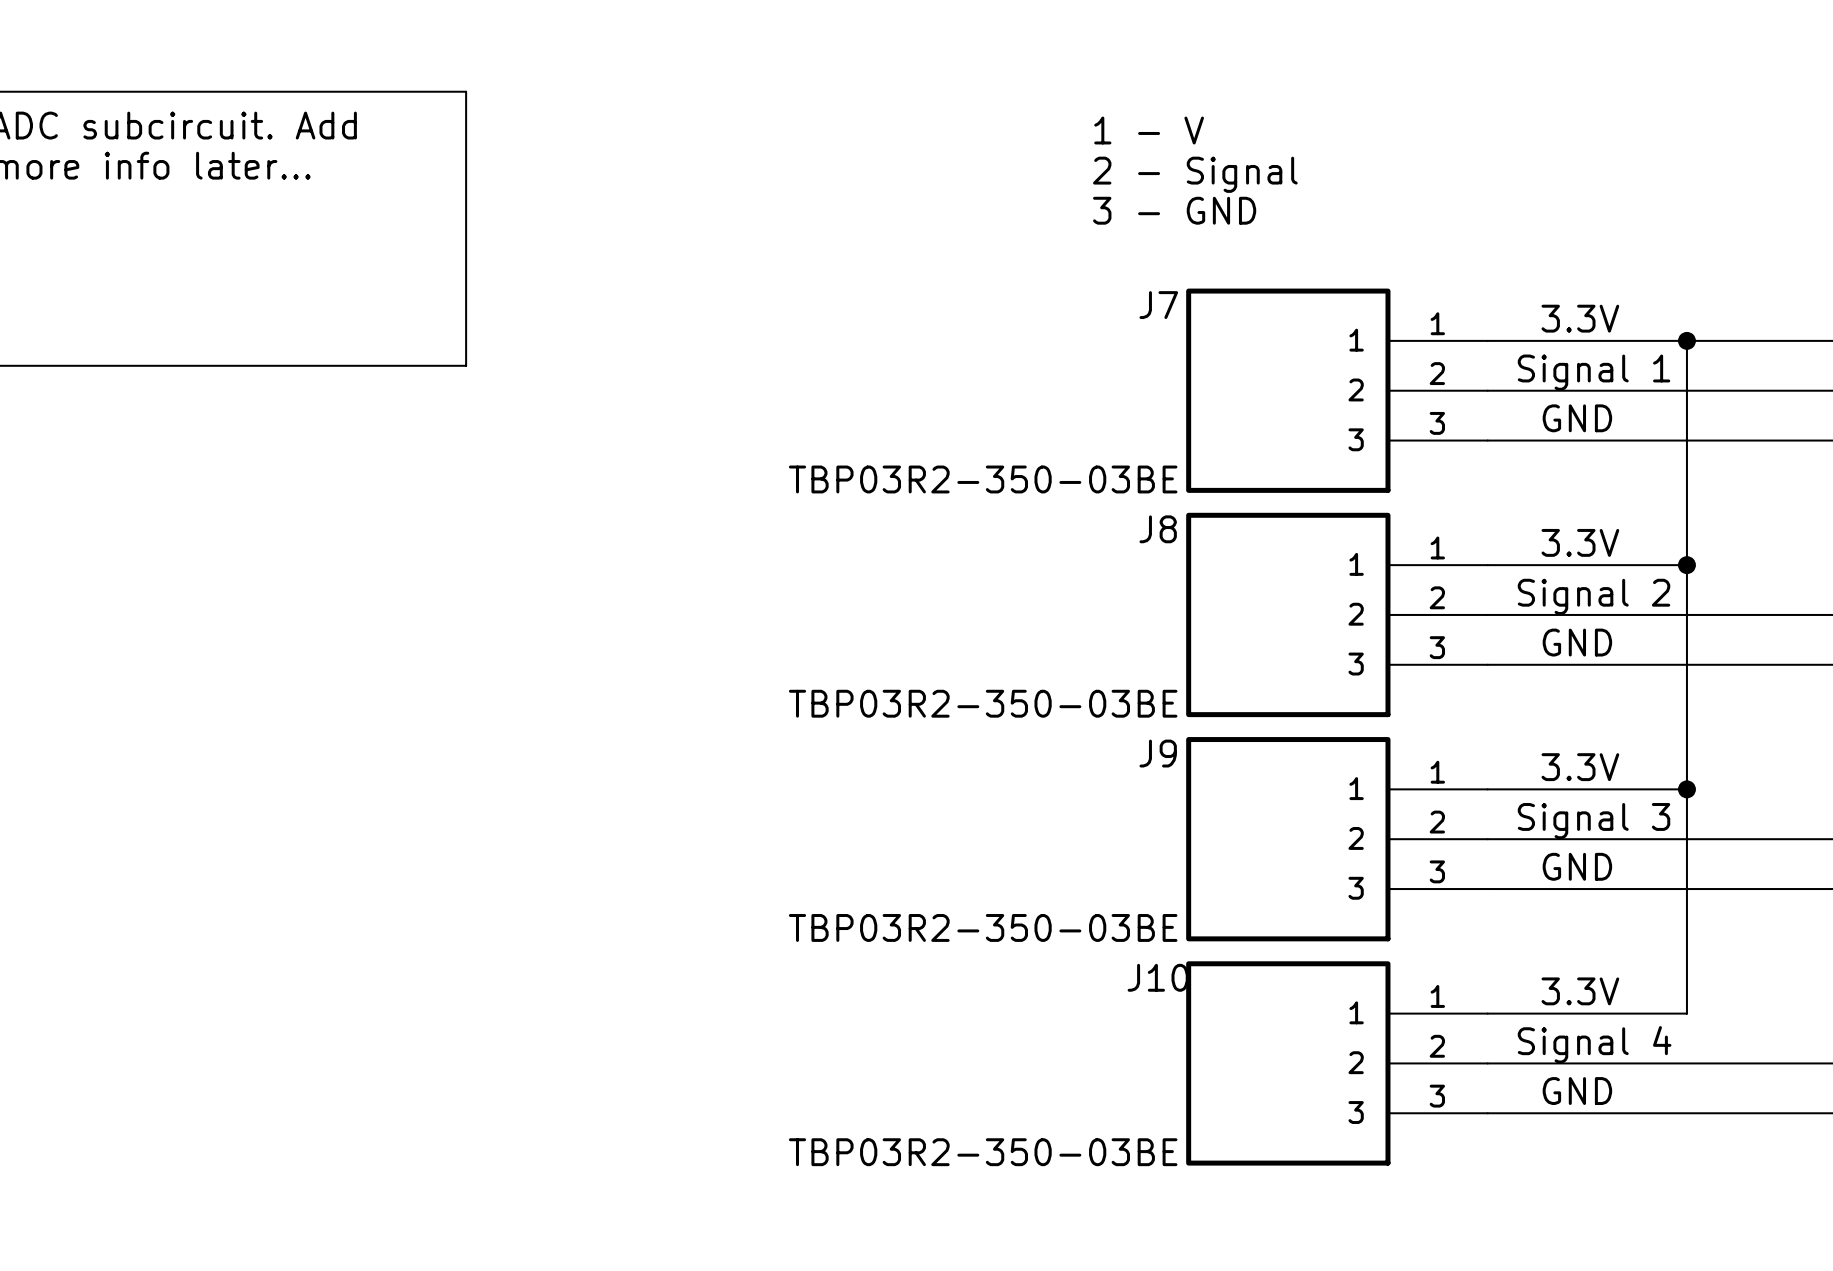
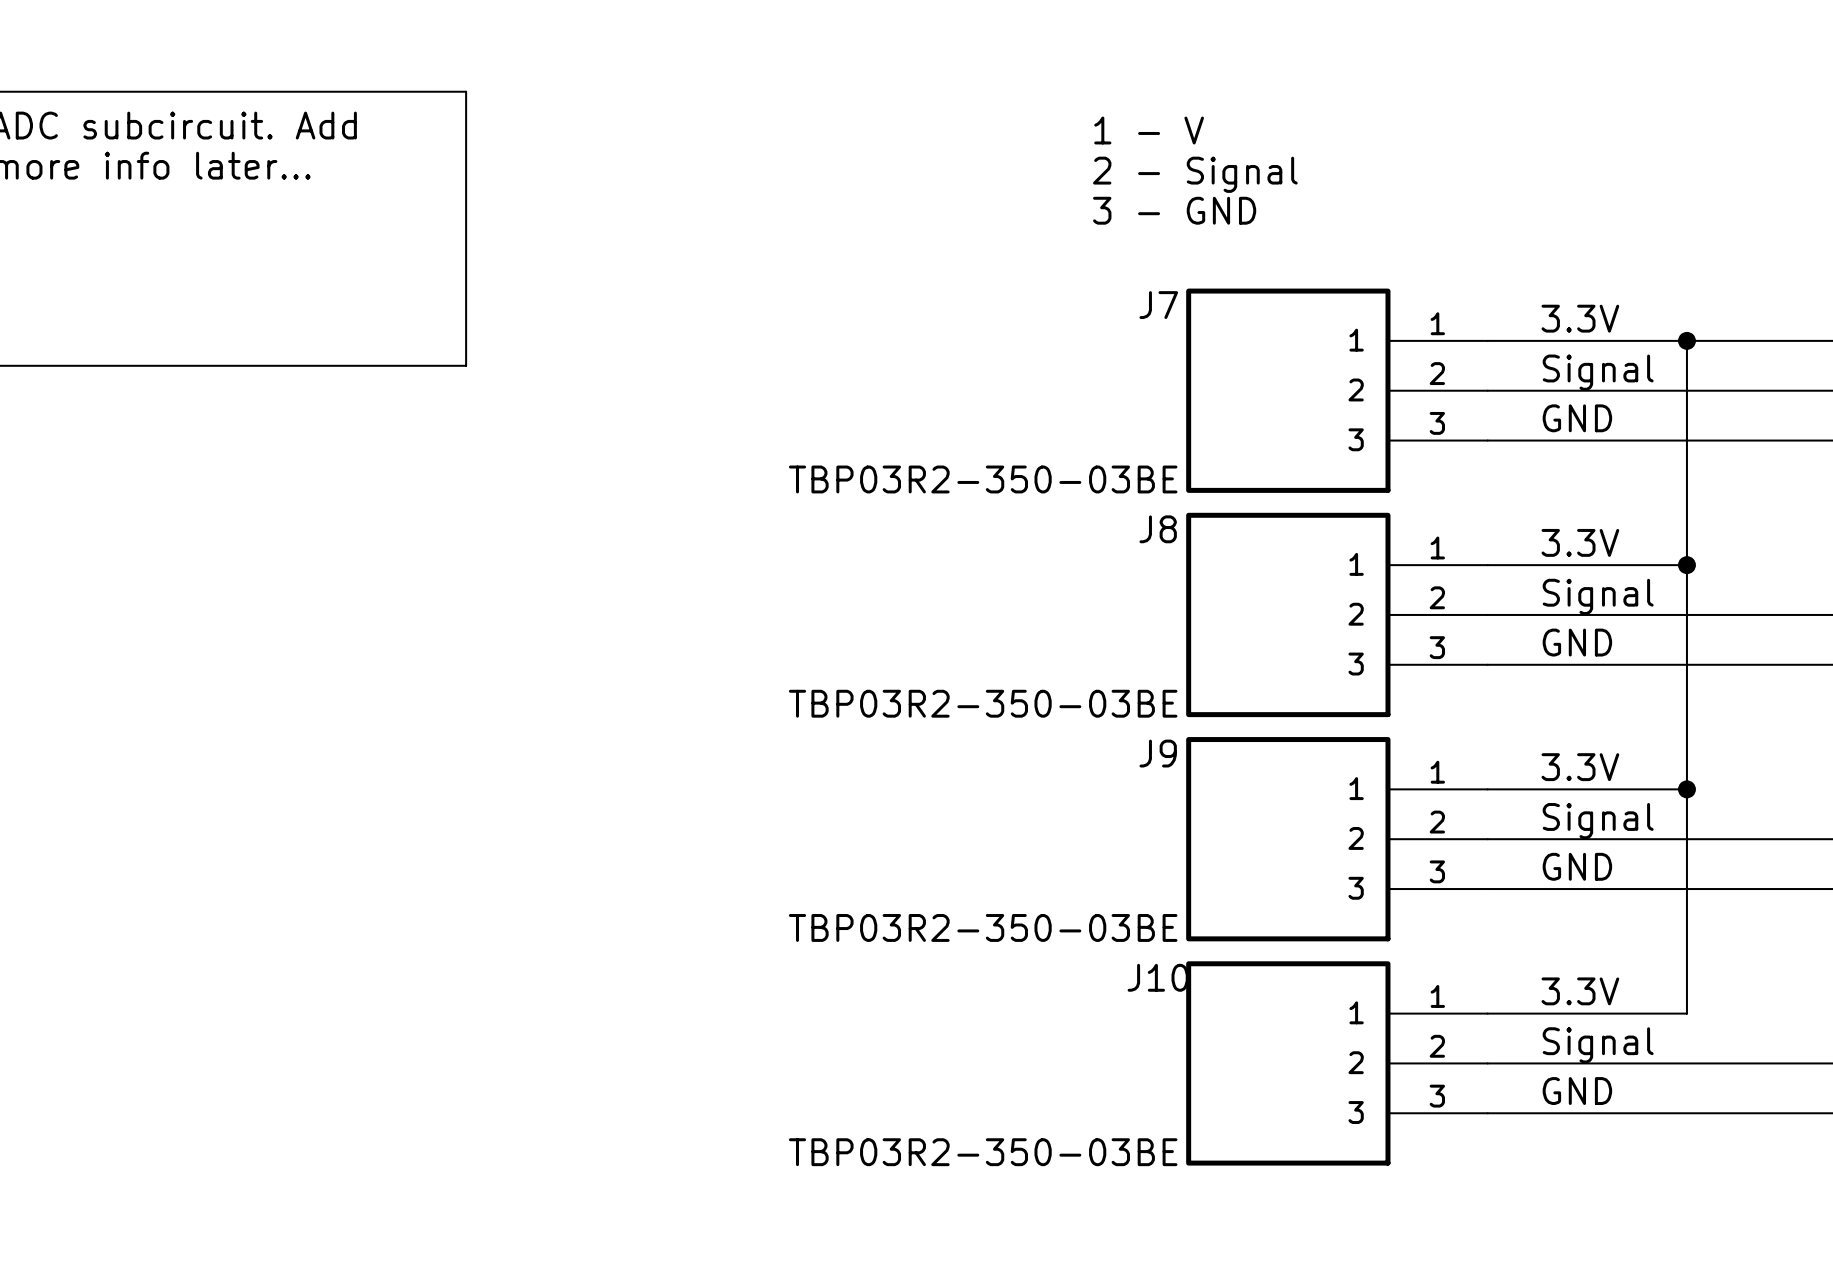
label: Signal 1 (1594, 372) -> Signal (1598, 372)
label: Signal 2 (1594, 596) -> Signal (1598, 596)
label: Signal 3 (1594, 821) -> Signal (1598, 821)
label: Signal 4 (1594, 1044) -> Signal (1598, 1045)

